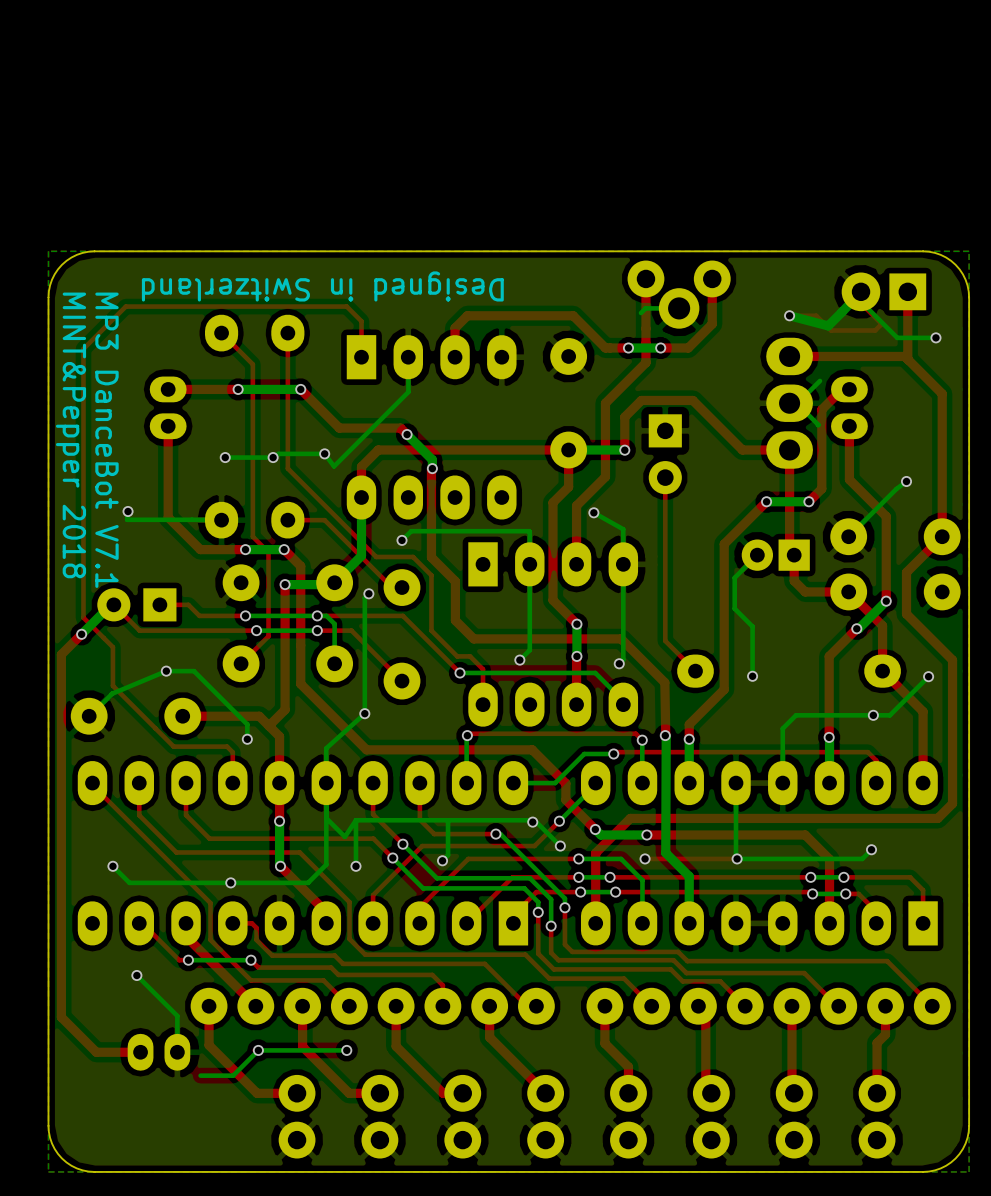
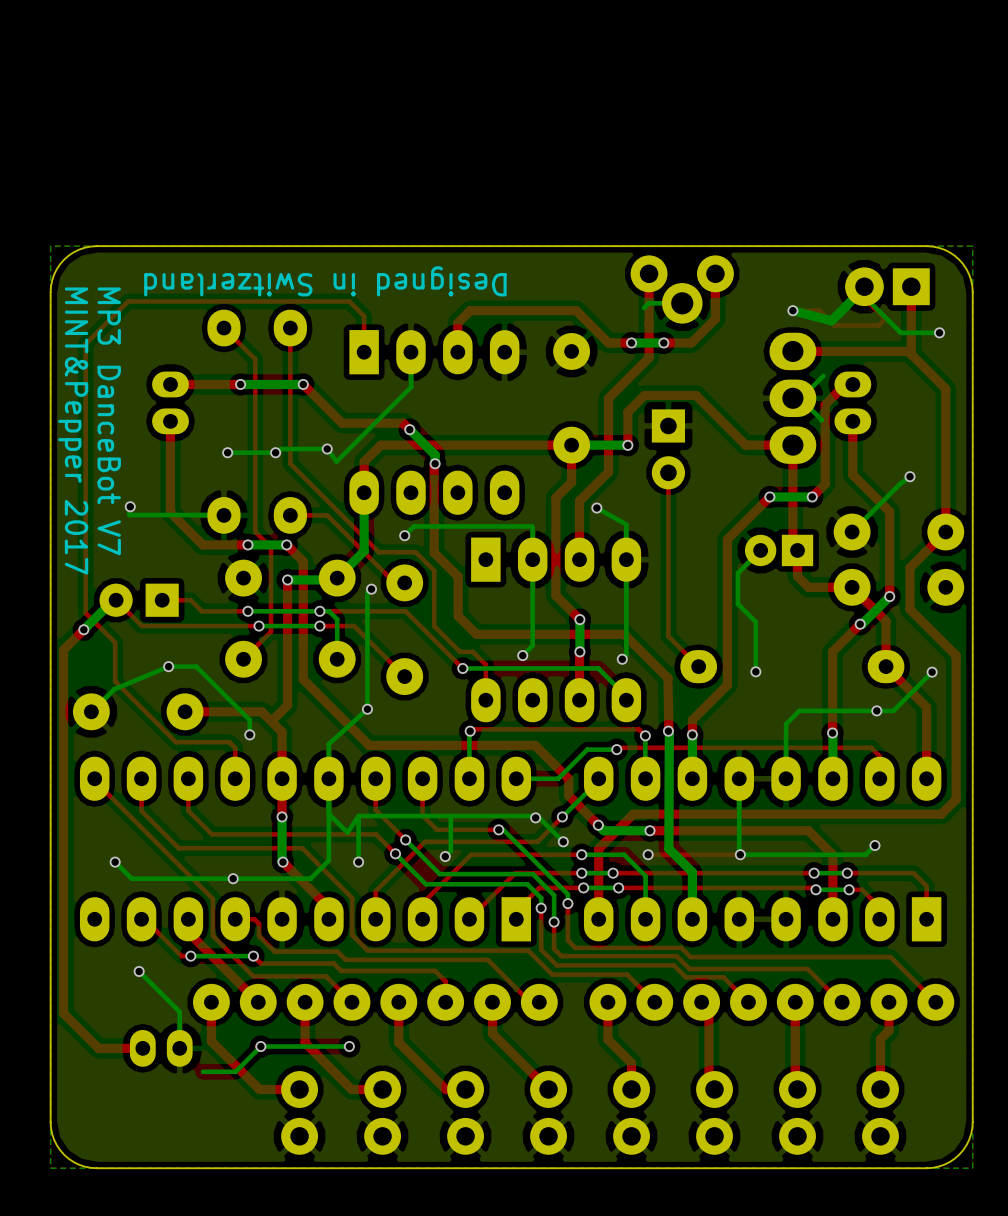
text: MINT&Pepper 2018 (71, 435) -> MINT&Pepper 2017 (73, 431)
text: MP3 DanceBot V7.1 (106, 440) -> MP3 DanceBot V7 (109, 421)

